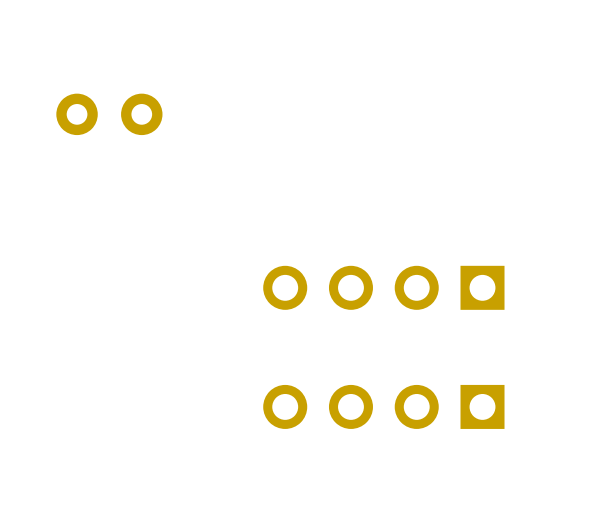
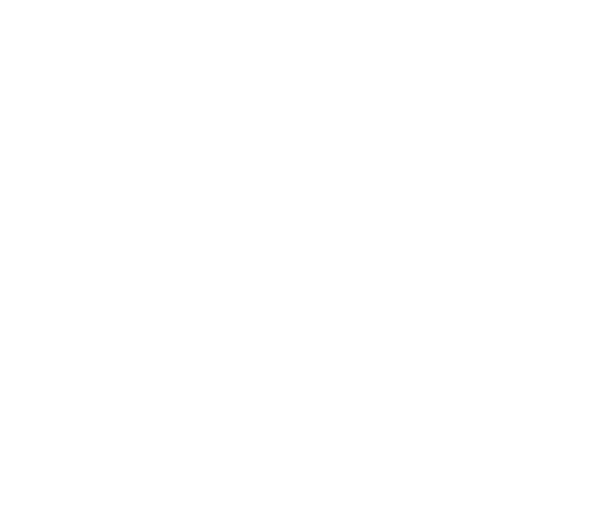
part: (109, 114) -> none
part: (383, 287) -> none
part: (383, 406) -> none

